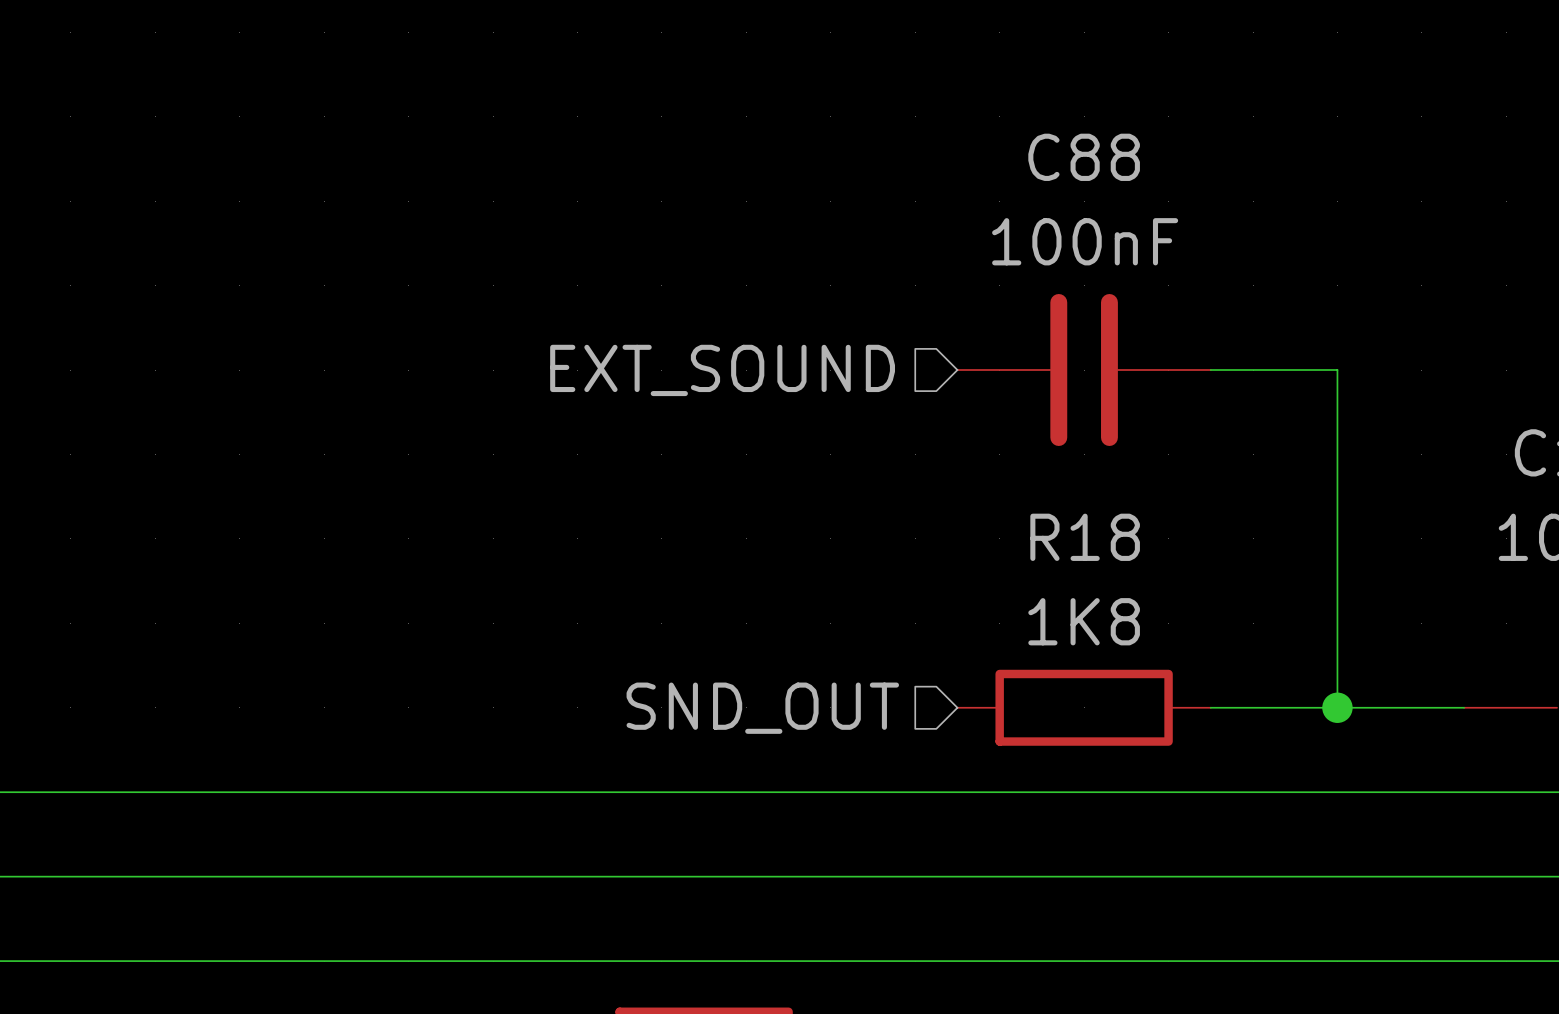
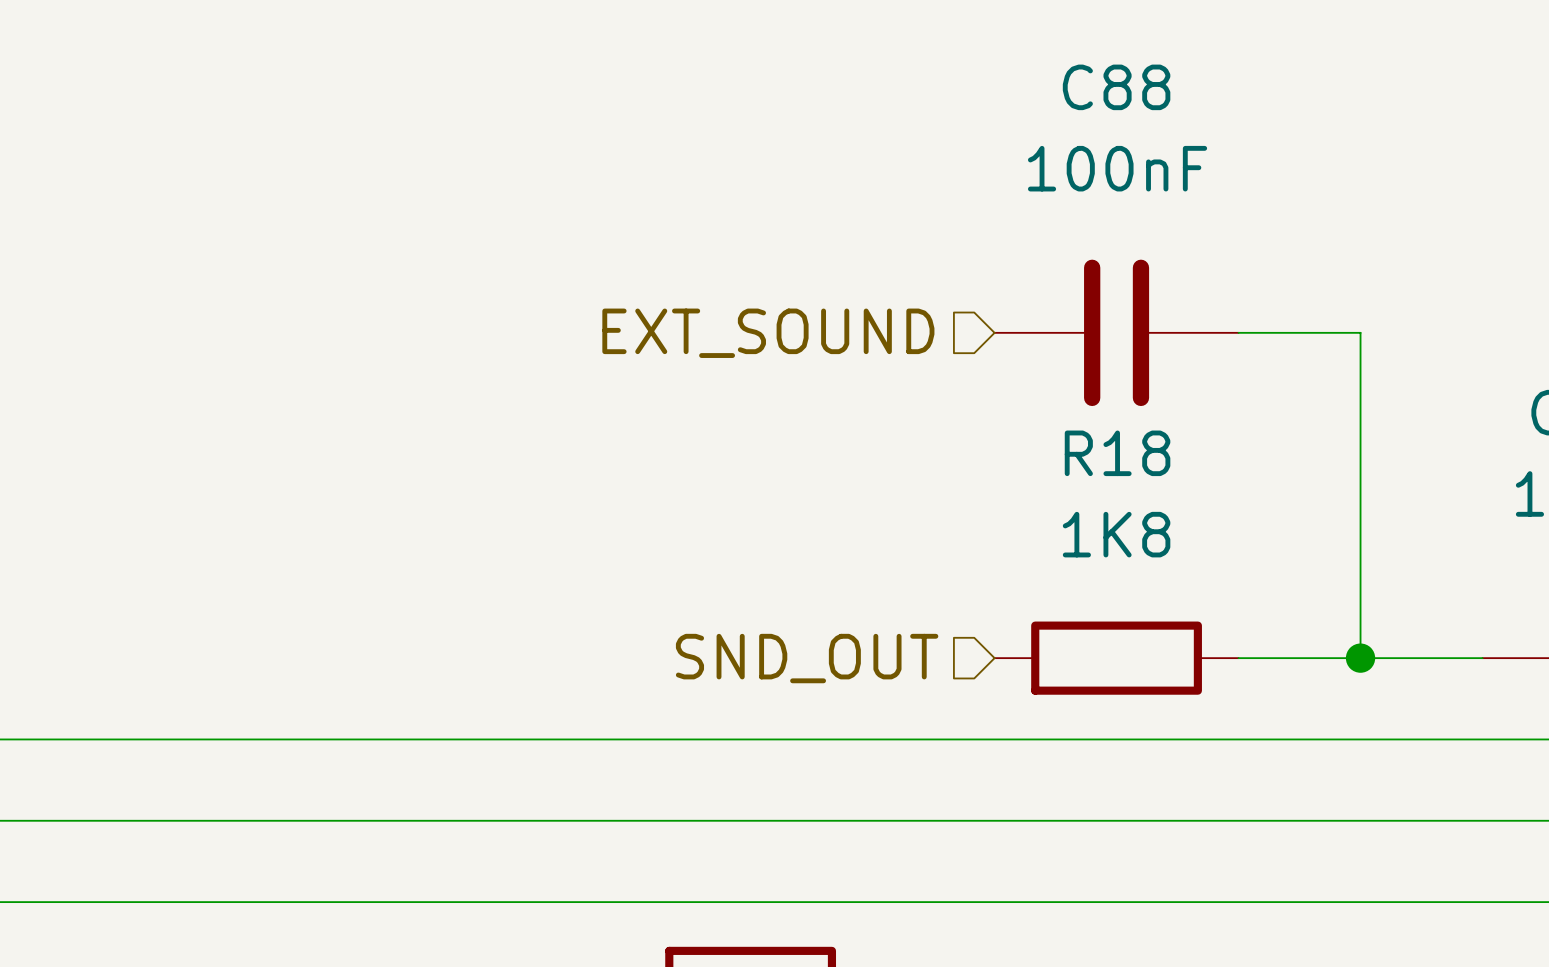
C88 name position: C88 (1084, 157) -> C88 (1116, 87)
C88 value position: 100nF (1085, 241) -> 100nF (1117, 168)
R18 name position: R18 (1085, 537) -> R18 (1117, 453)
R18 value position: 1K8 (1084, 621) -> 1K8 (1116, 534)

